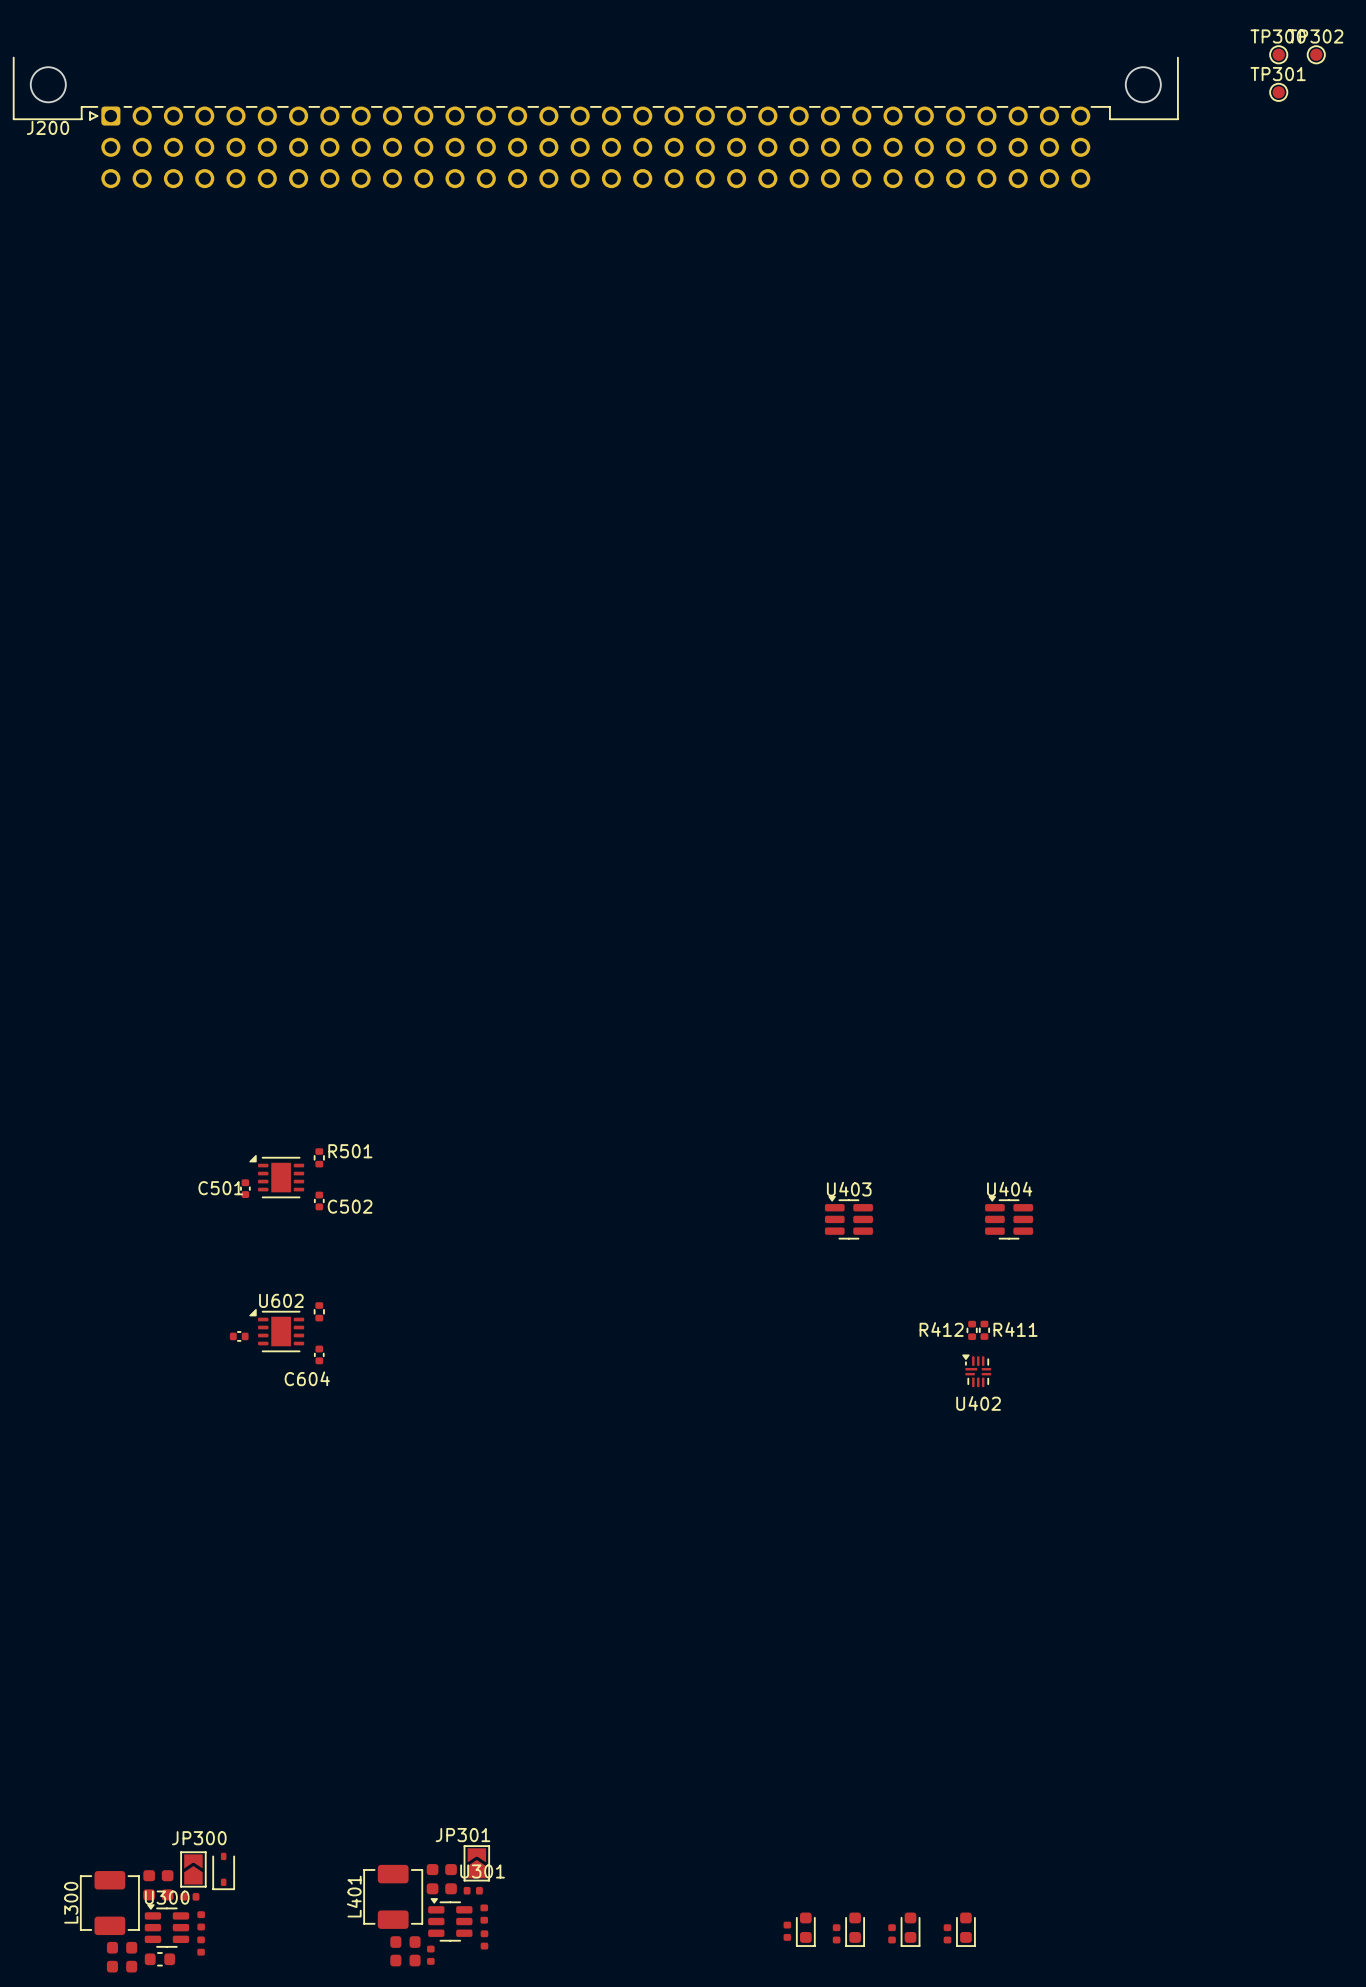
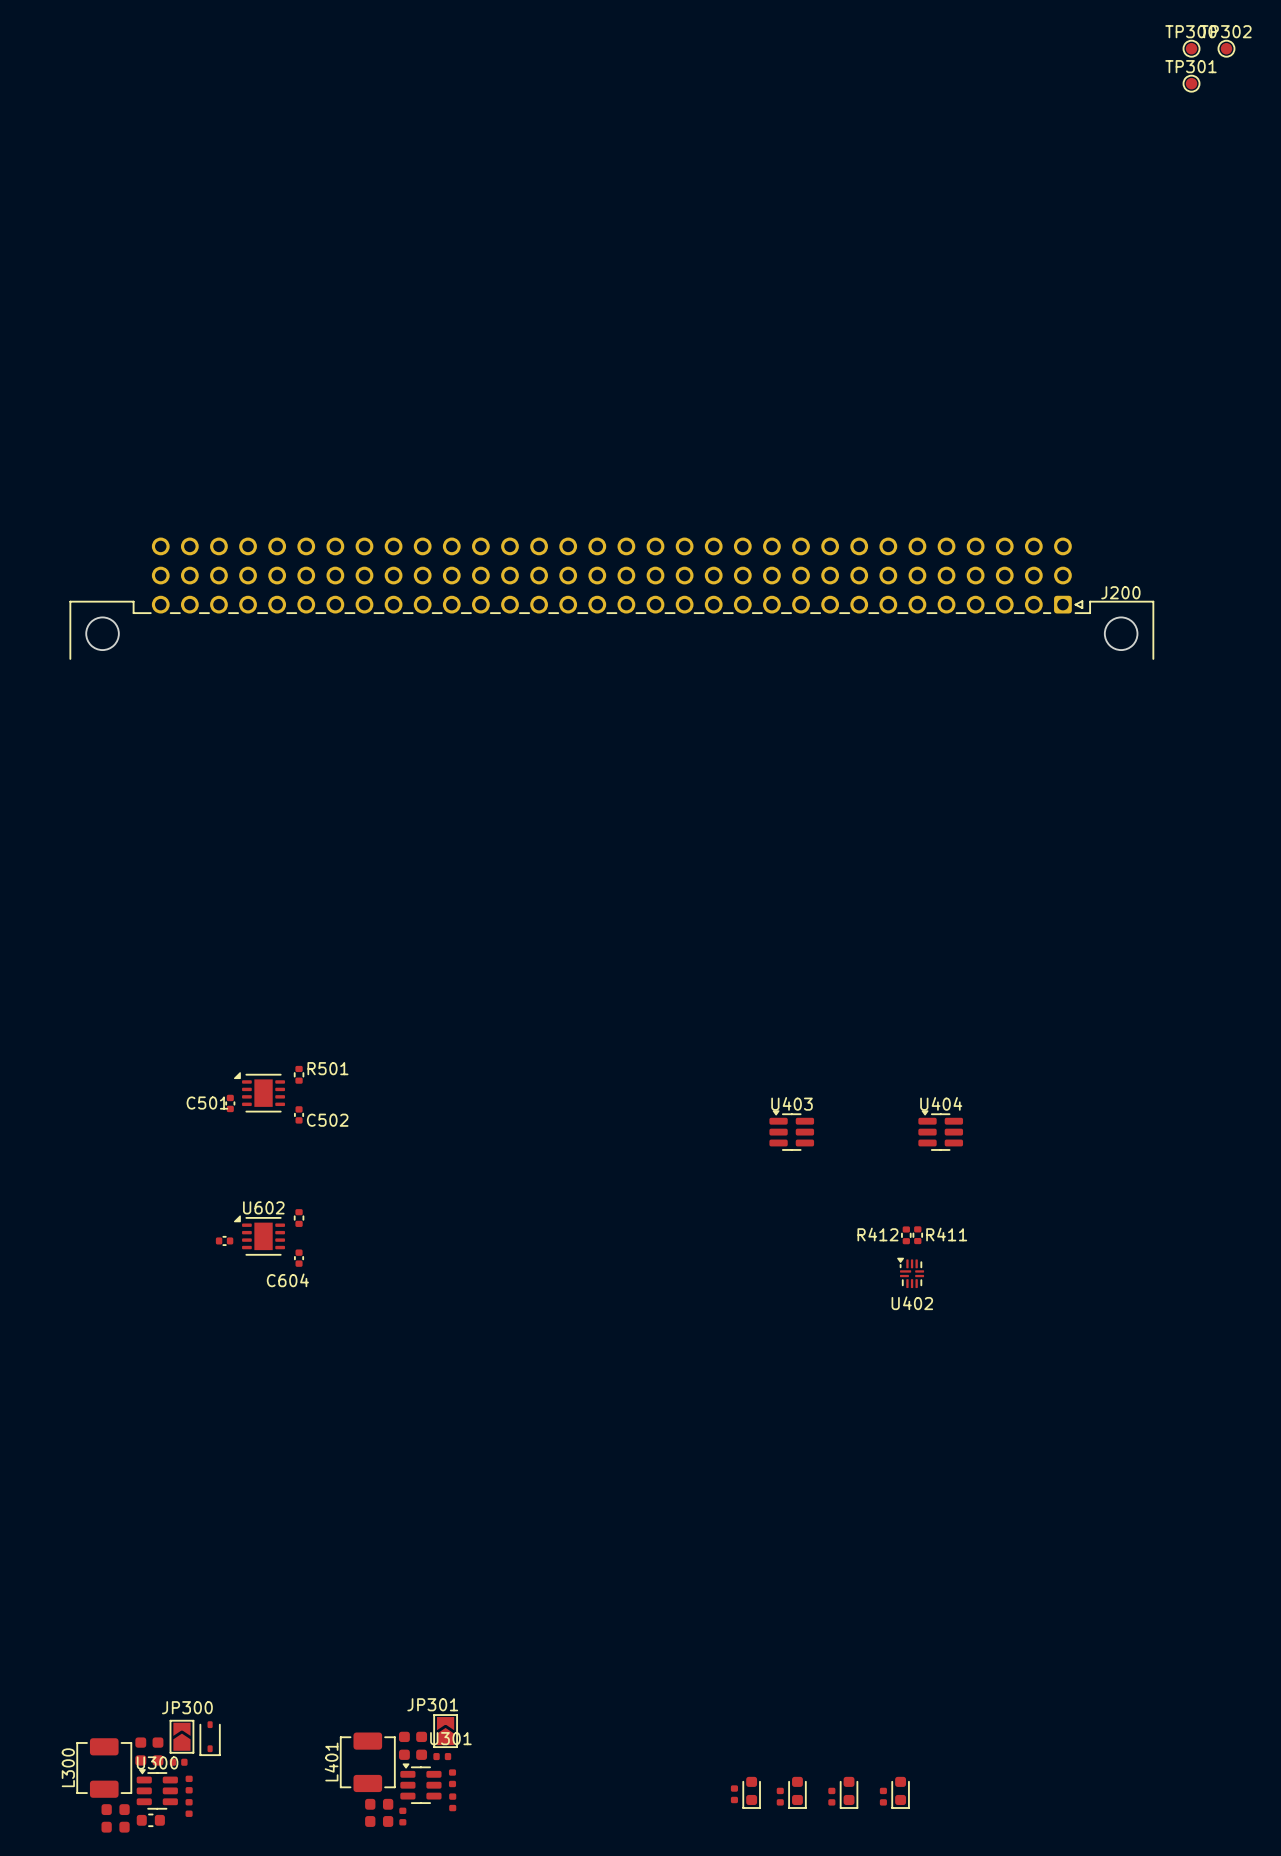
J200 rotation: 0° (595, 122) -> 180° (611, 598)

